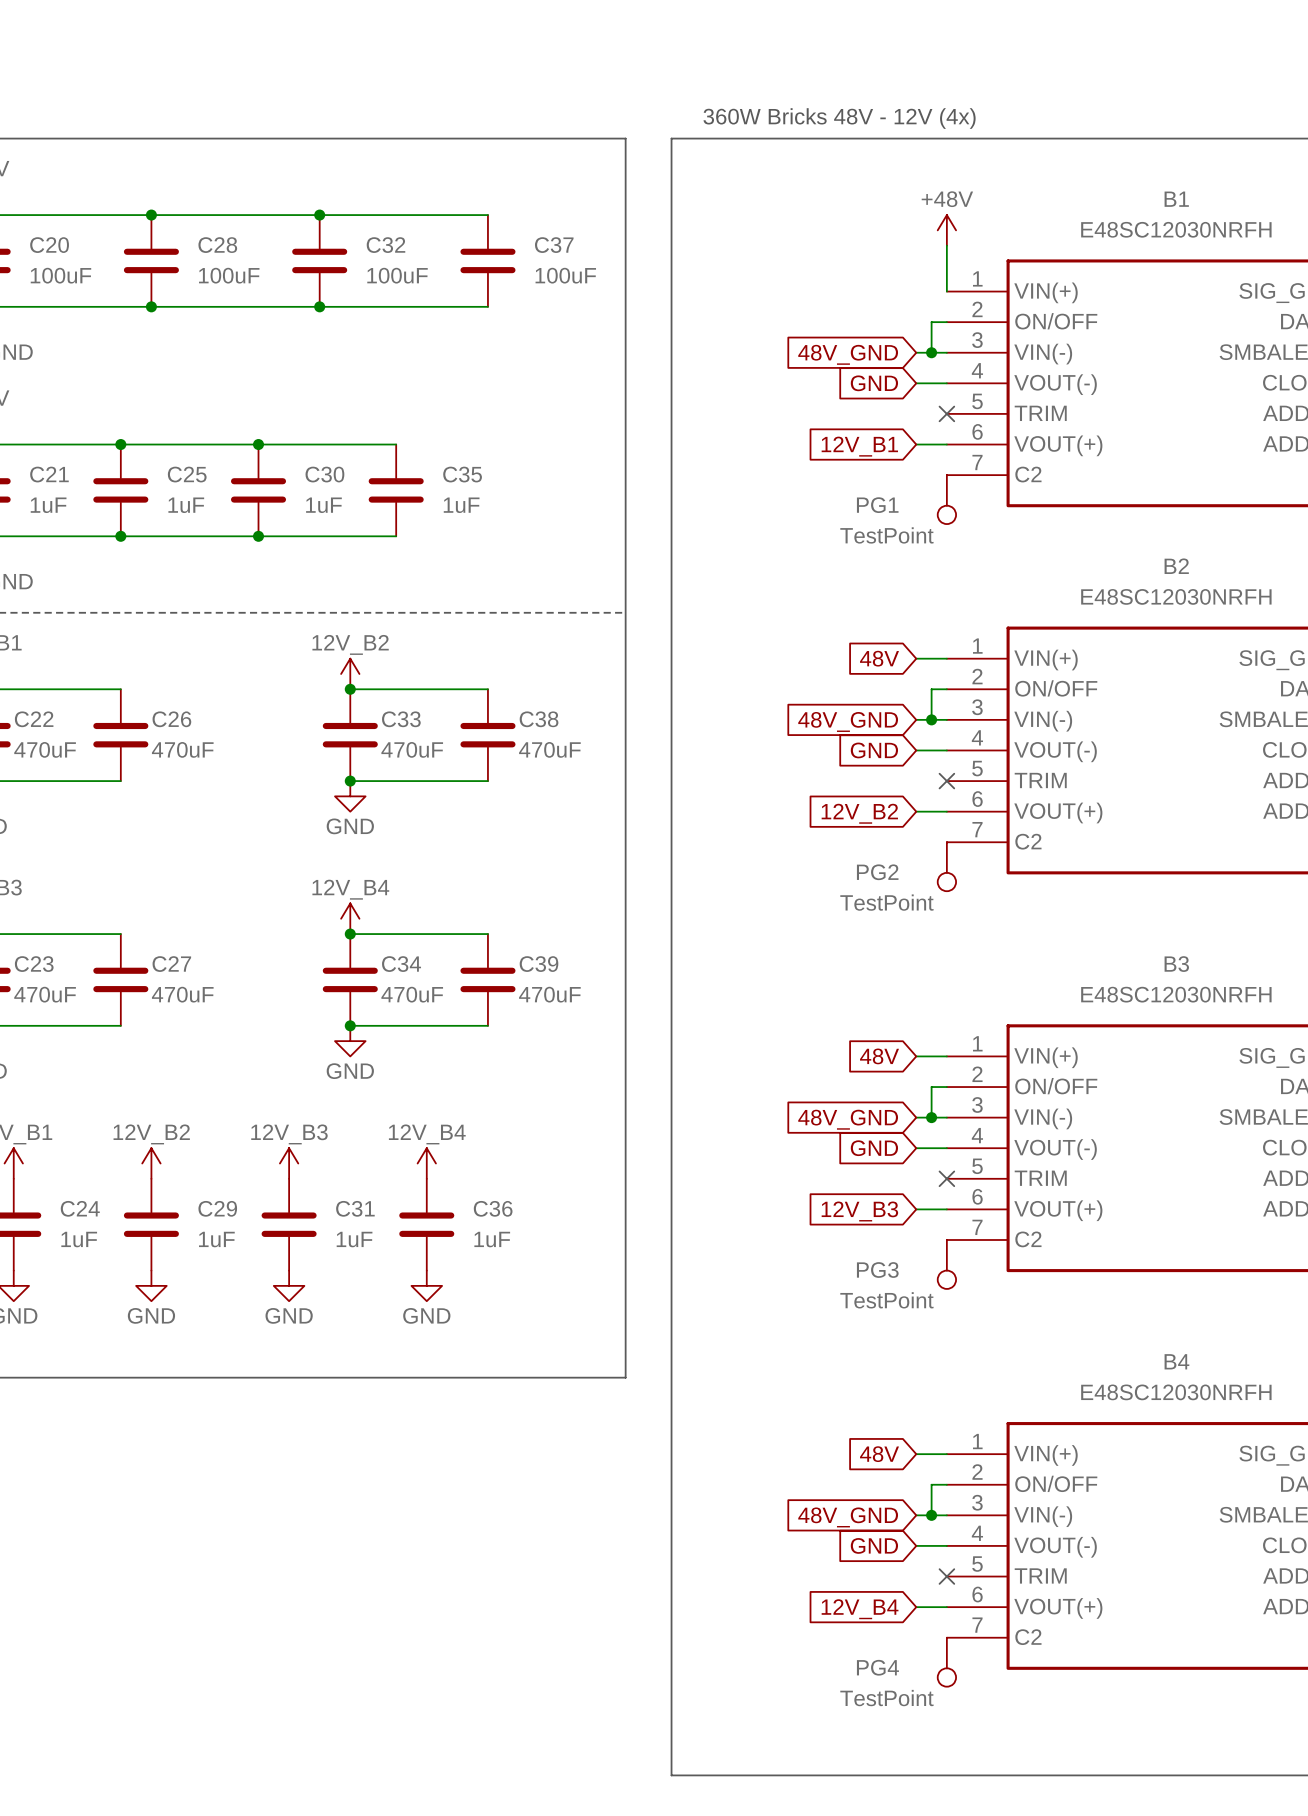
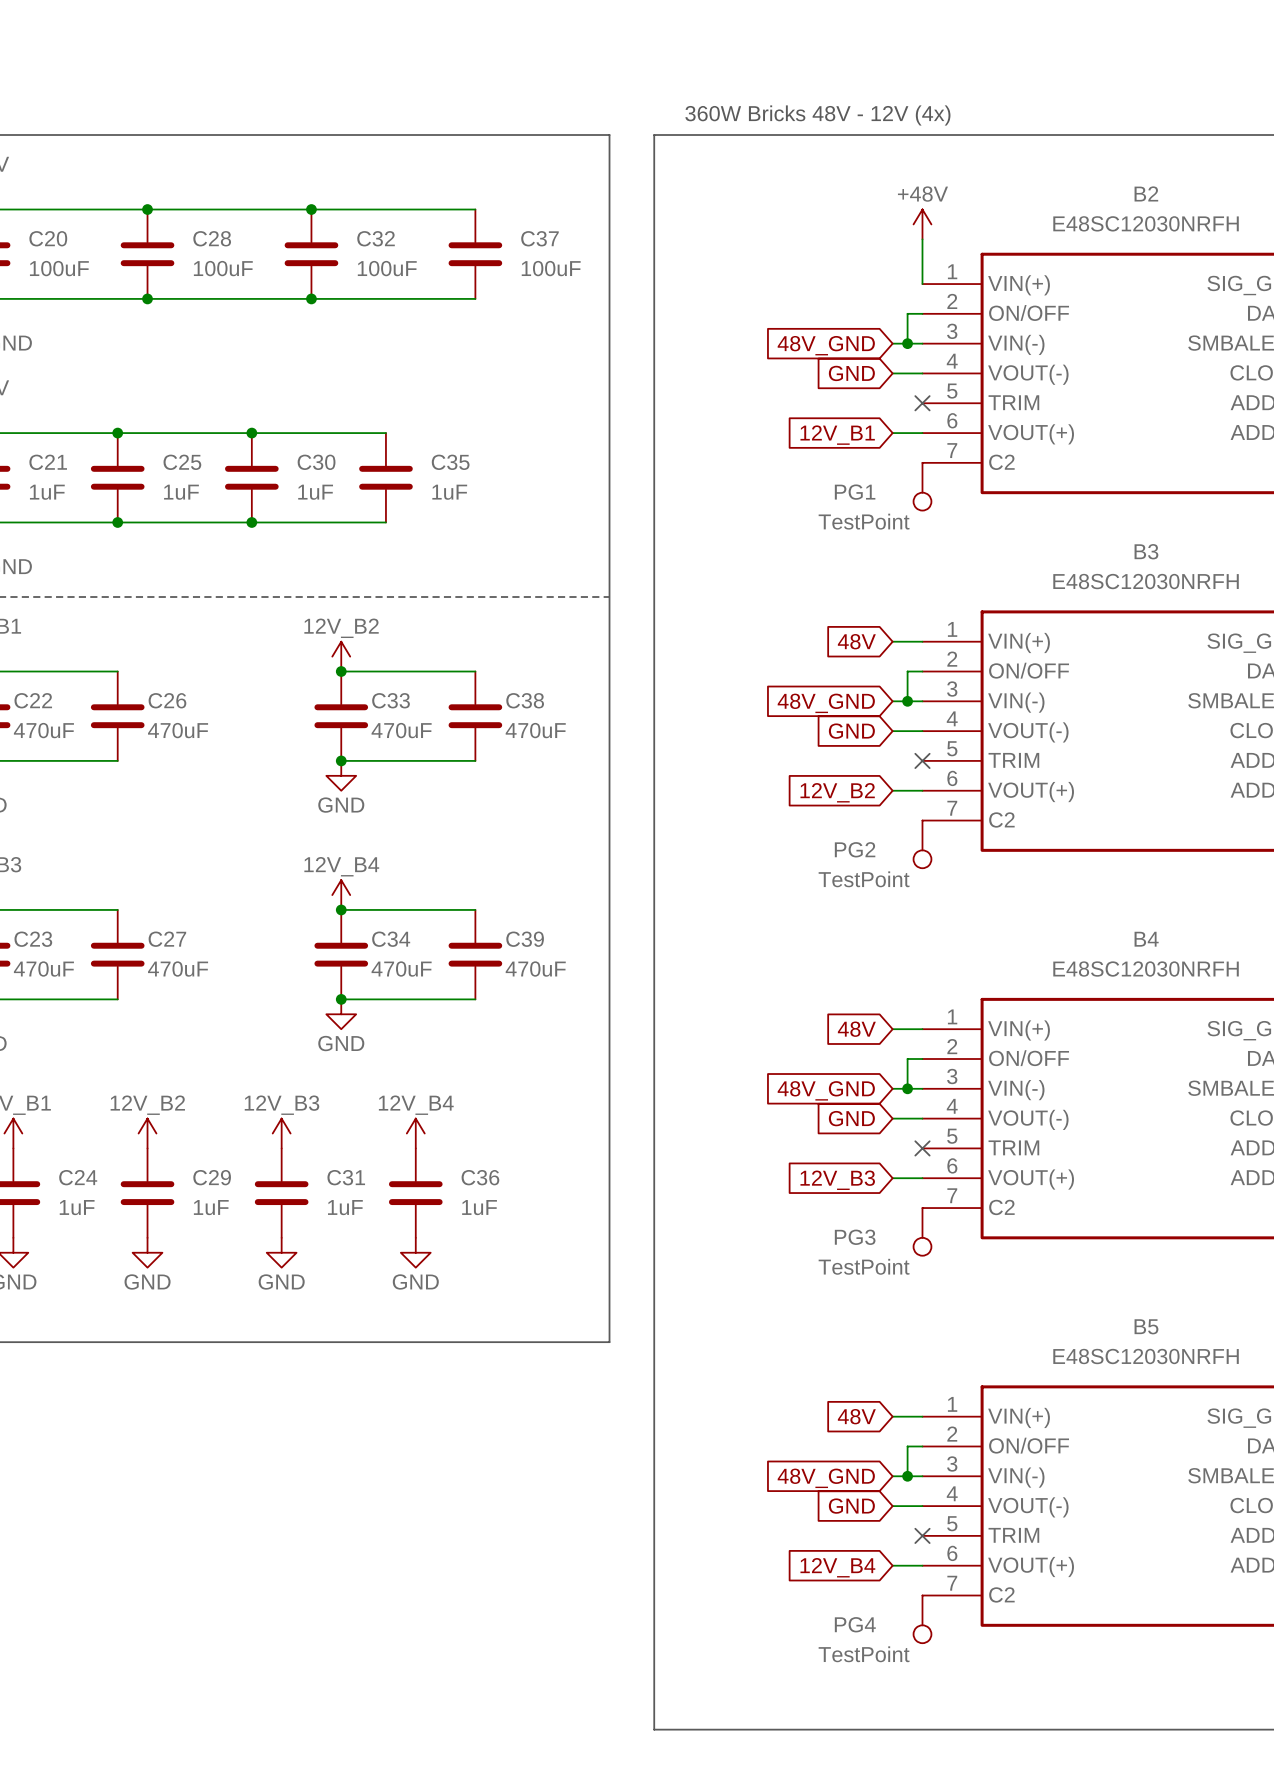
B1 name: B1 (1176, 199) -> B2 (1146, 193)
B2 name: B2 (1176, 566) -> B3 (1146, 551)
B3 name: B3 (1176, 964) -> B4 (1146, 939)
B4 name: B4 (1176, 1361) -> B5 (1146, 1326)

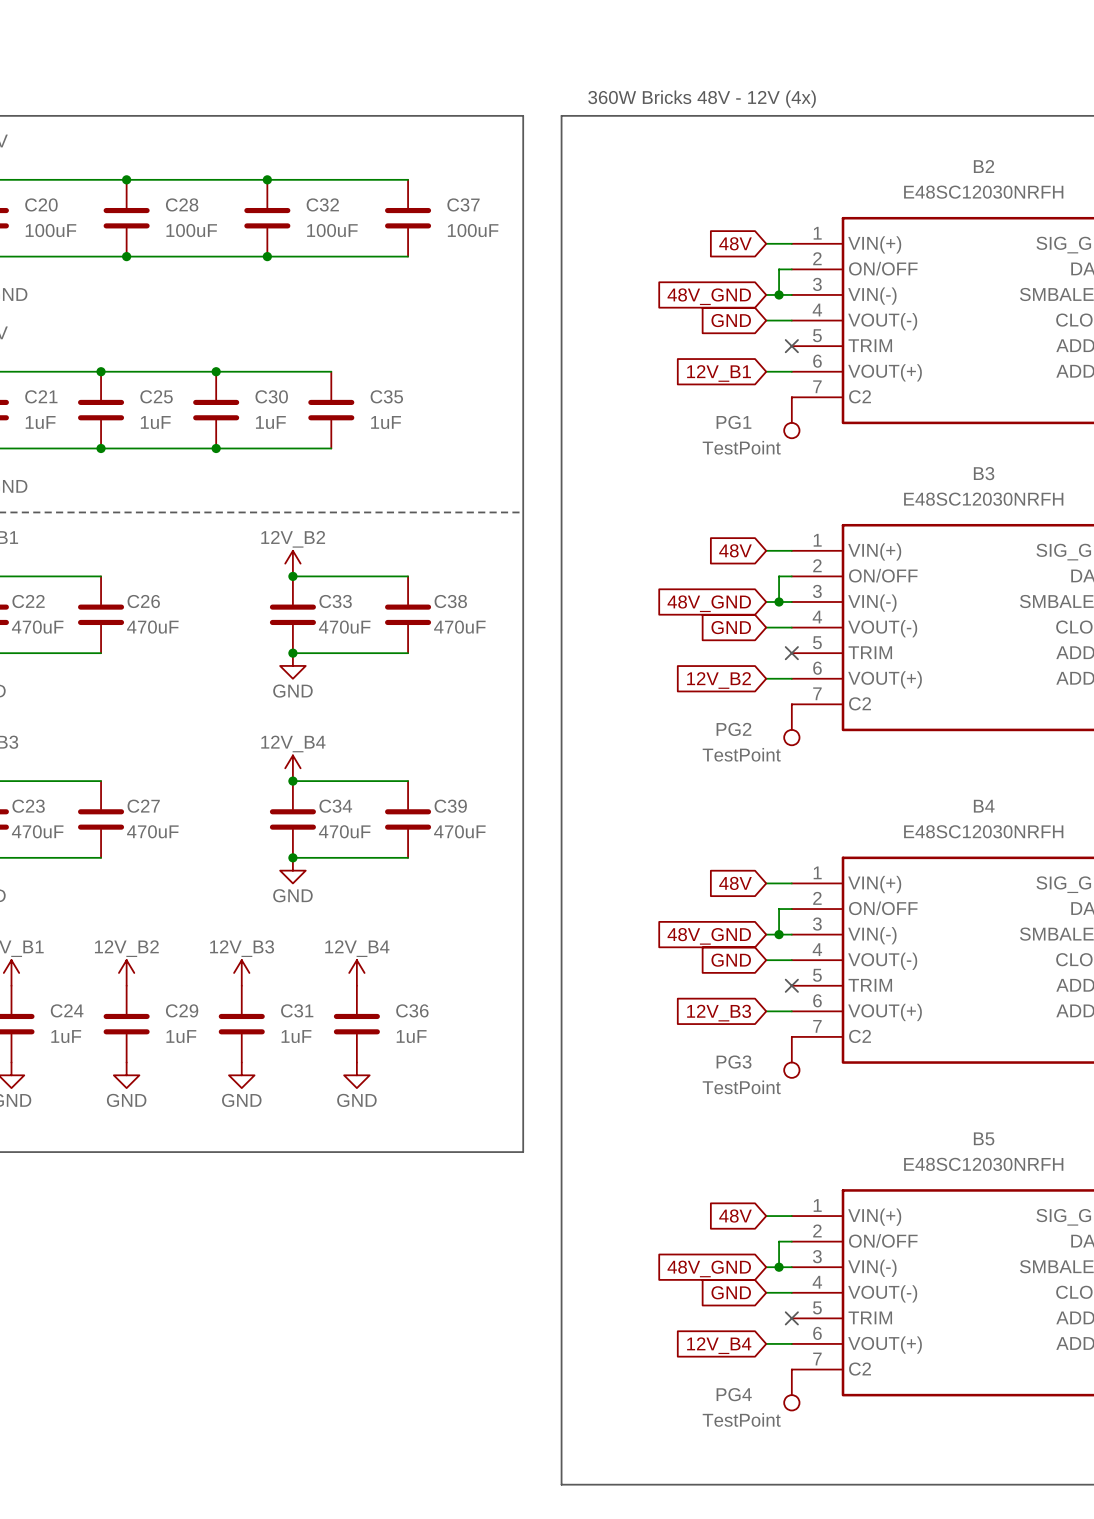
power symbol: +48V (922, 224) -> none
wire: (922, 239) (922, 284) -> (766, 243) (791, 243)
global label: none -> 48V (735, 243)

